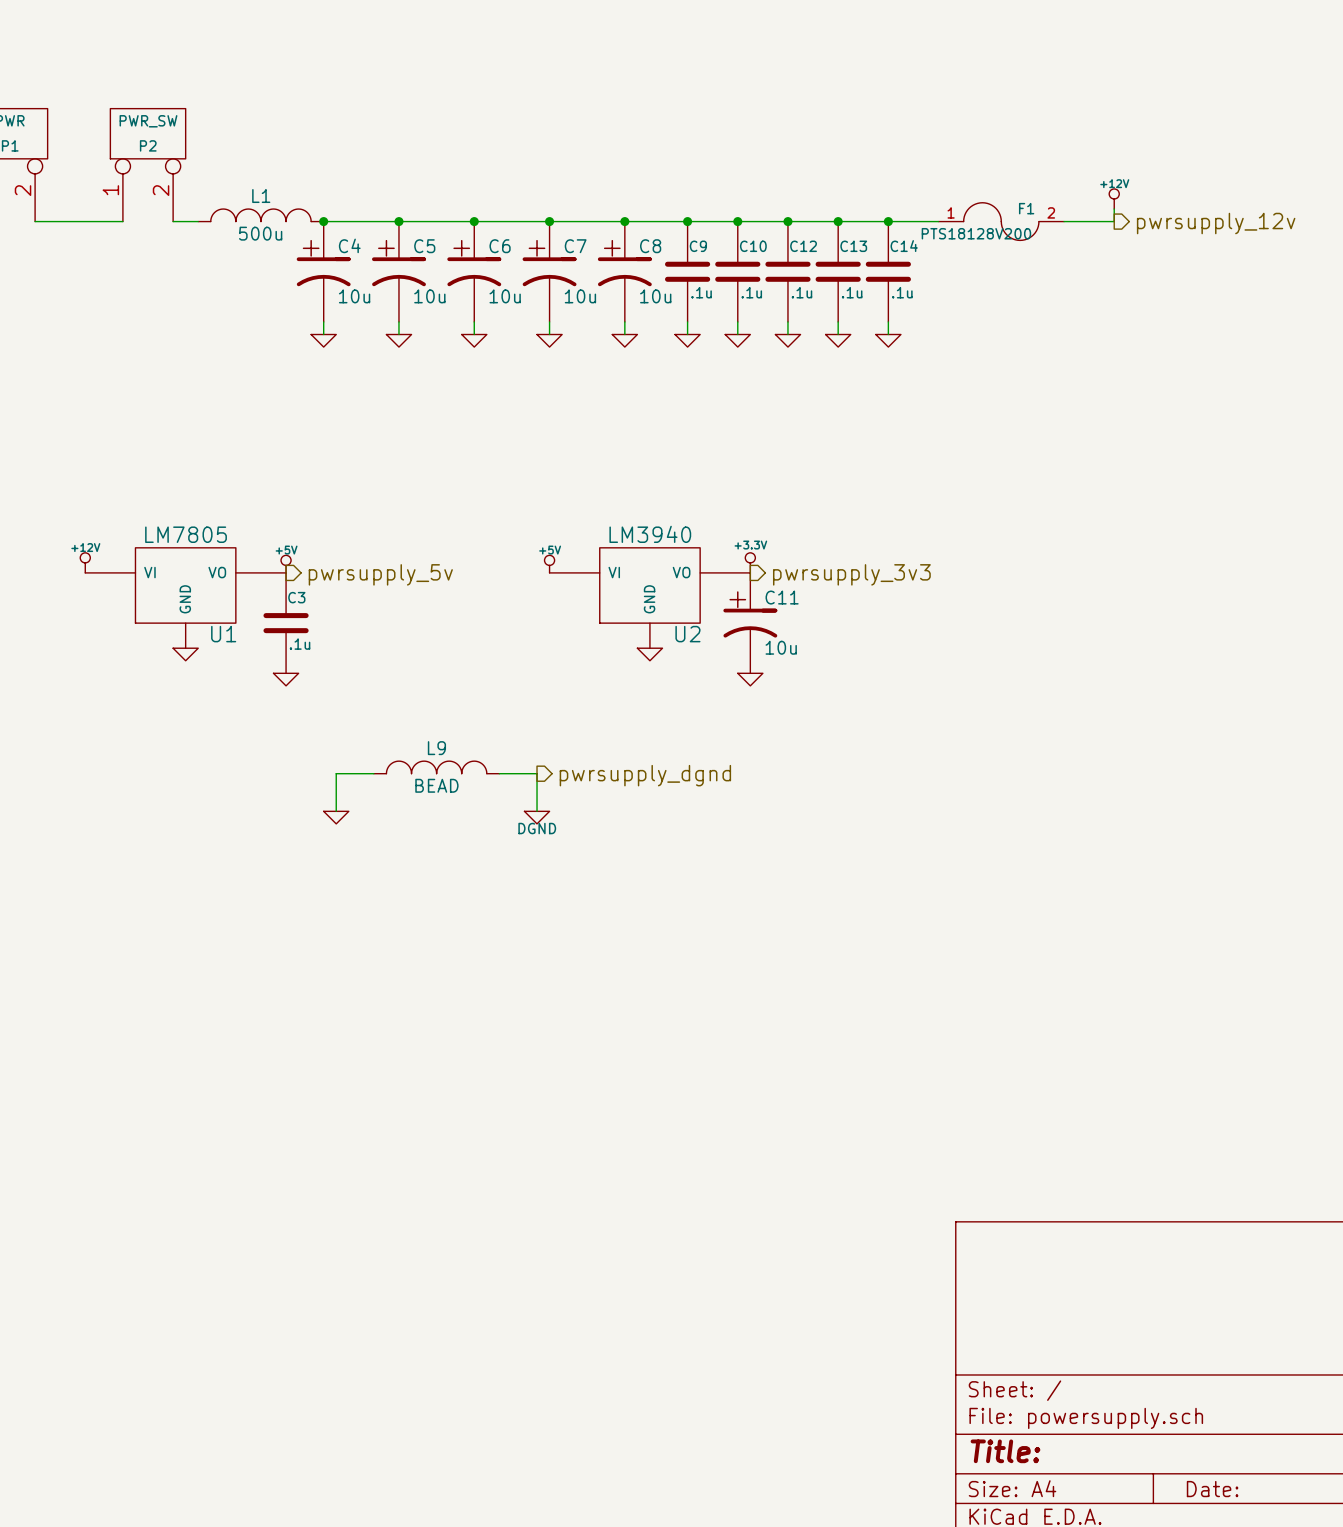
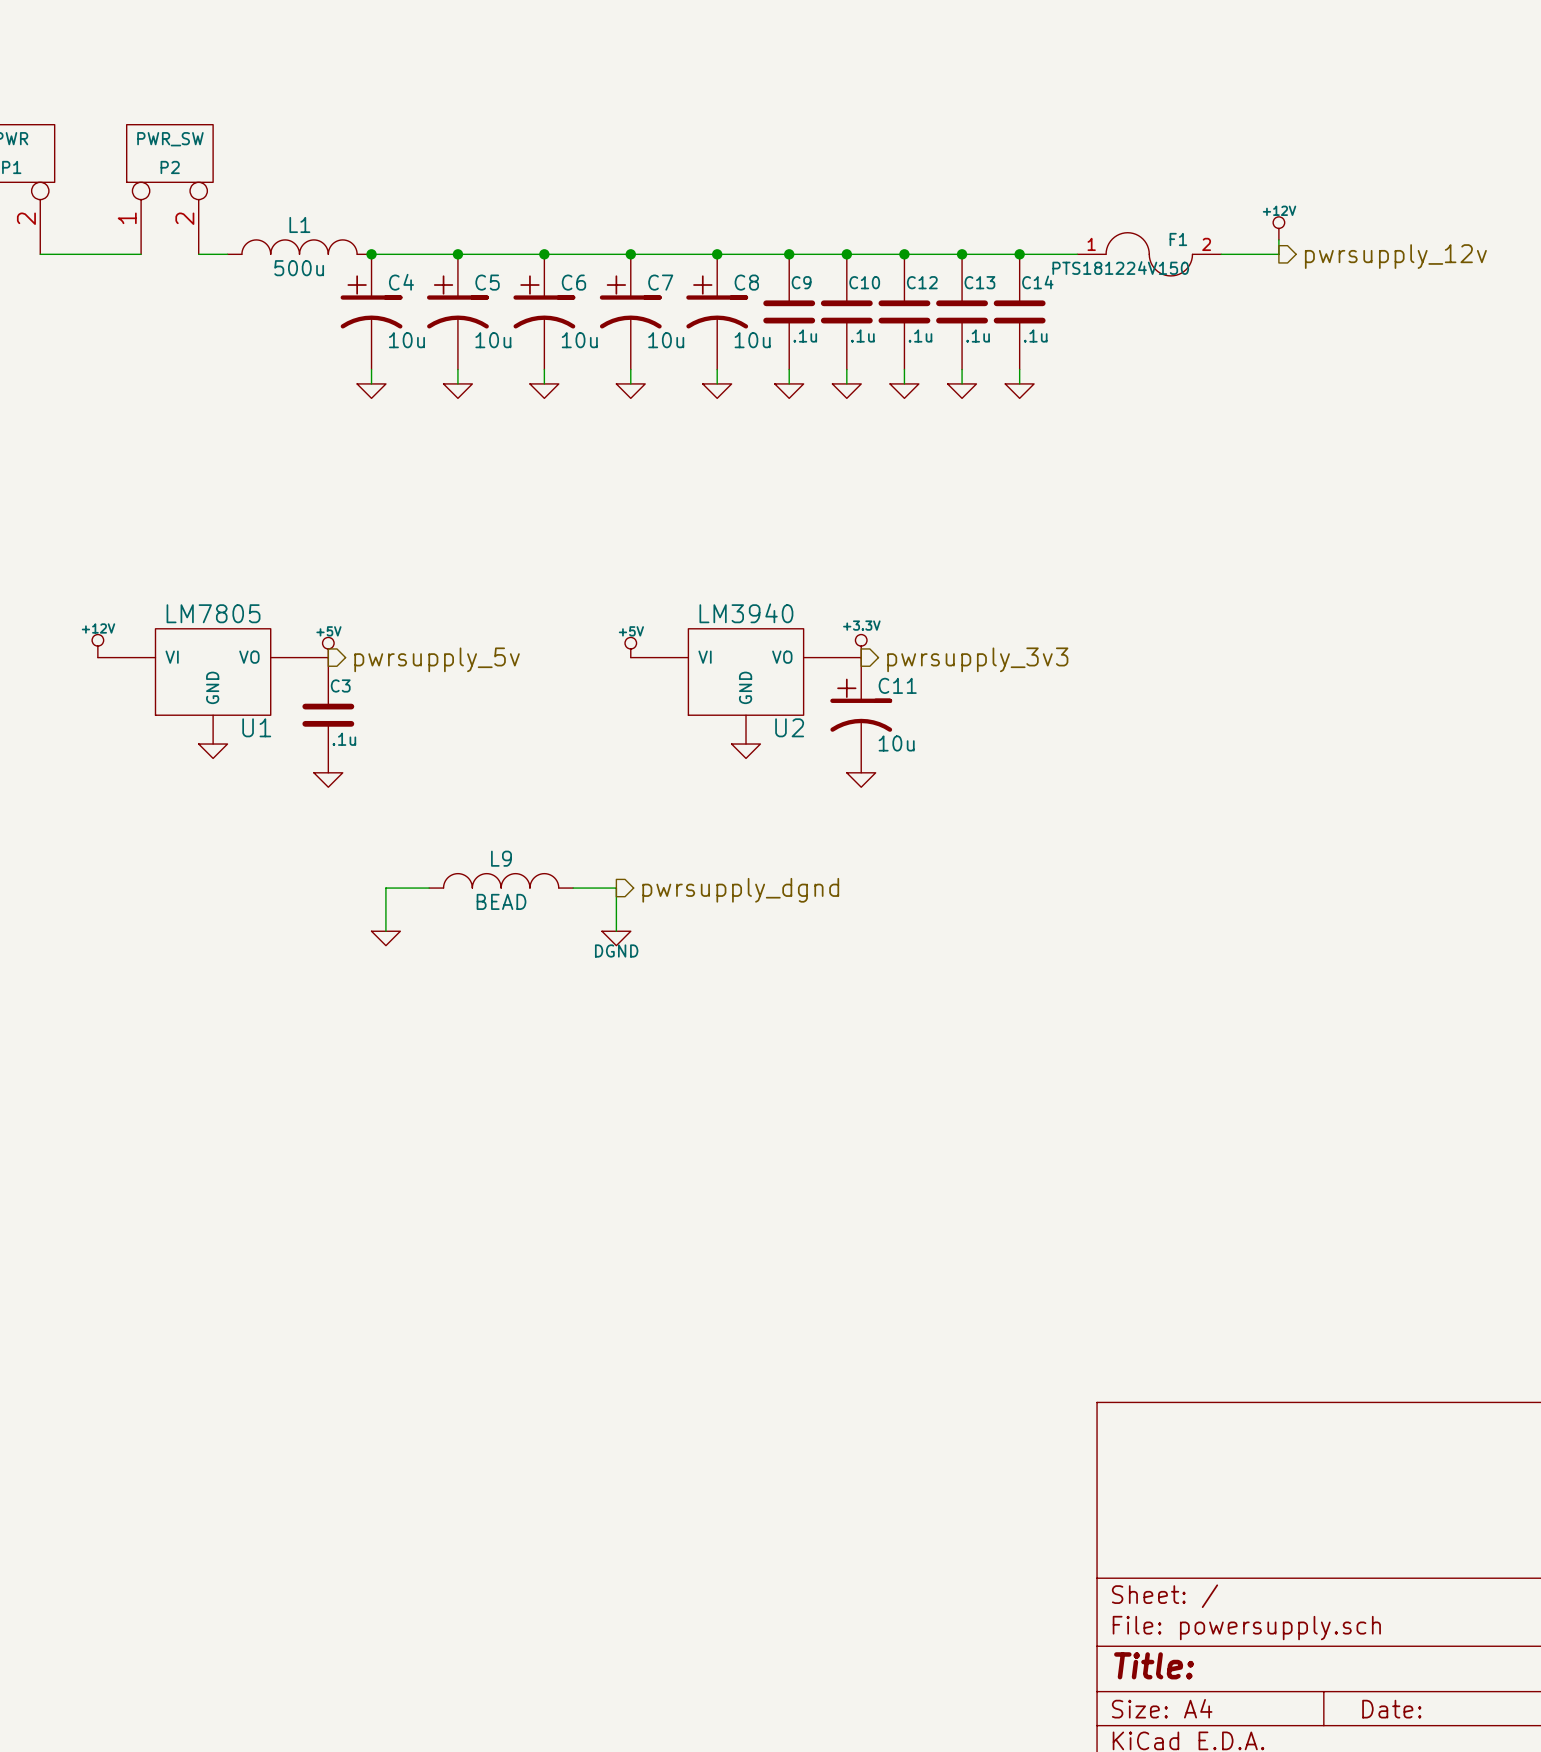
F1 value: PTS18128V200 (976, 233) -> PTS181224V150 (1120, 268)

